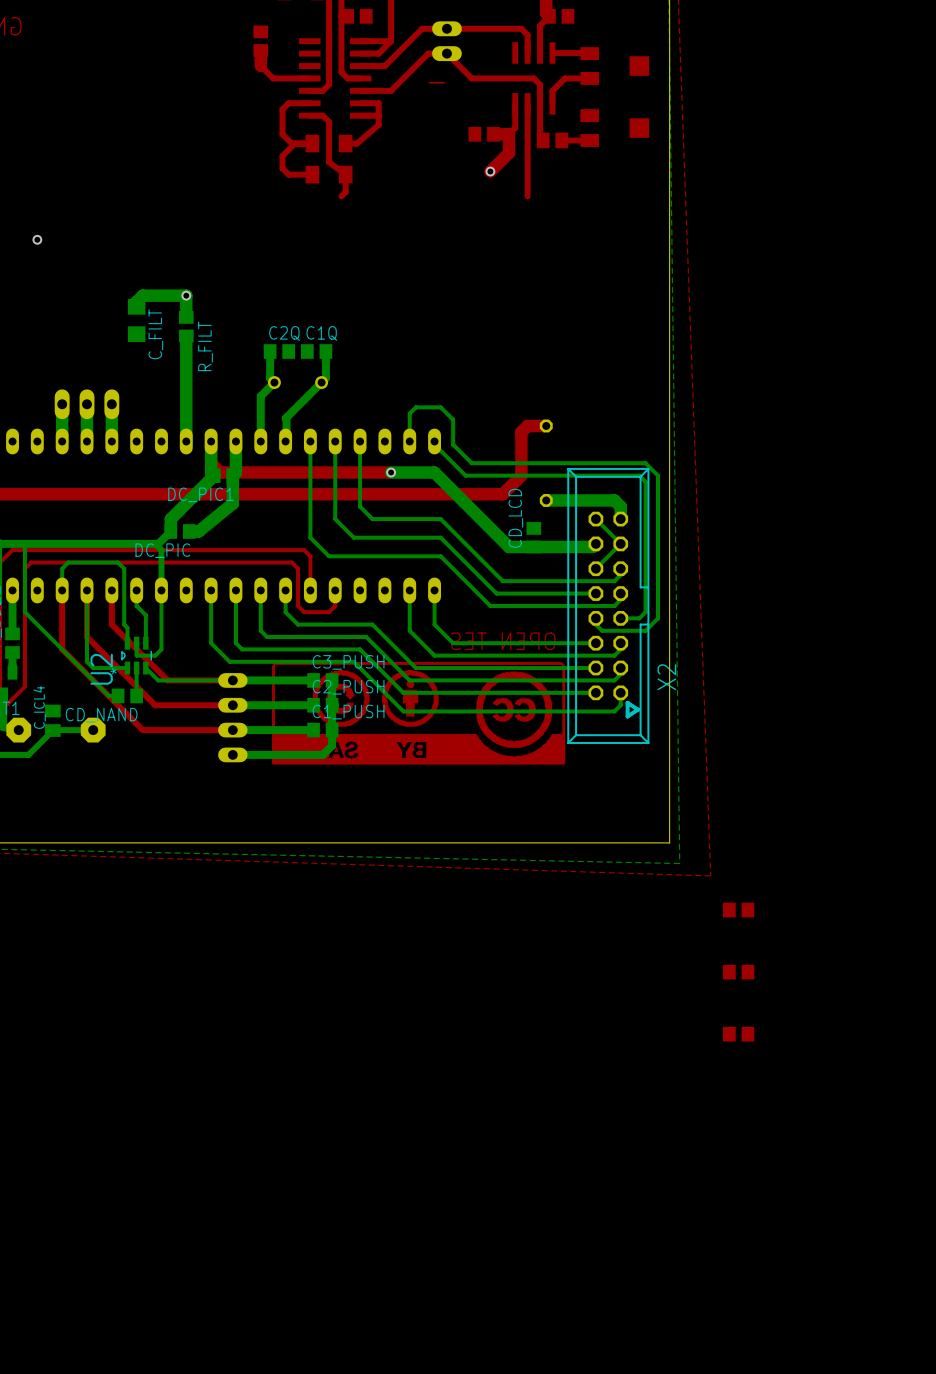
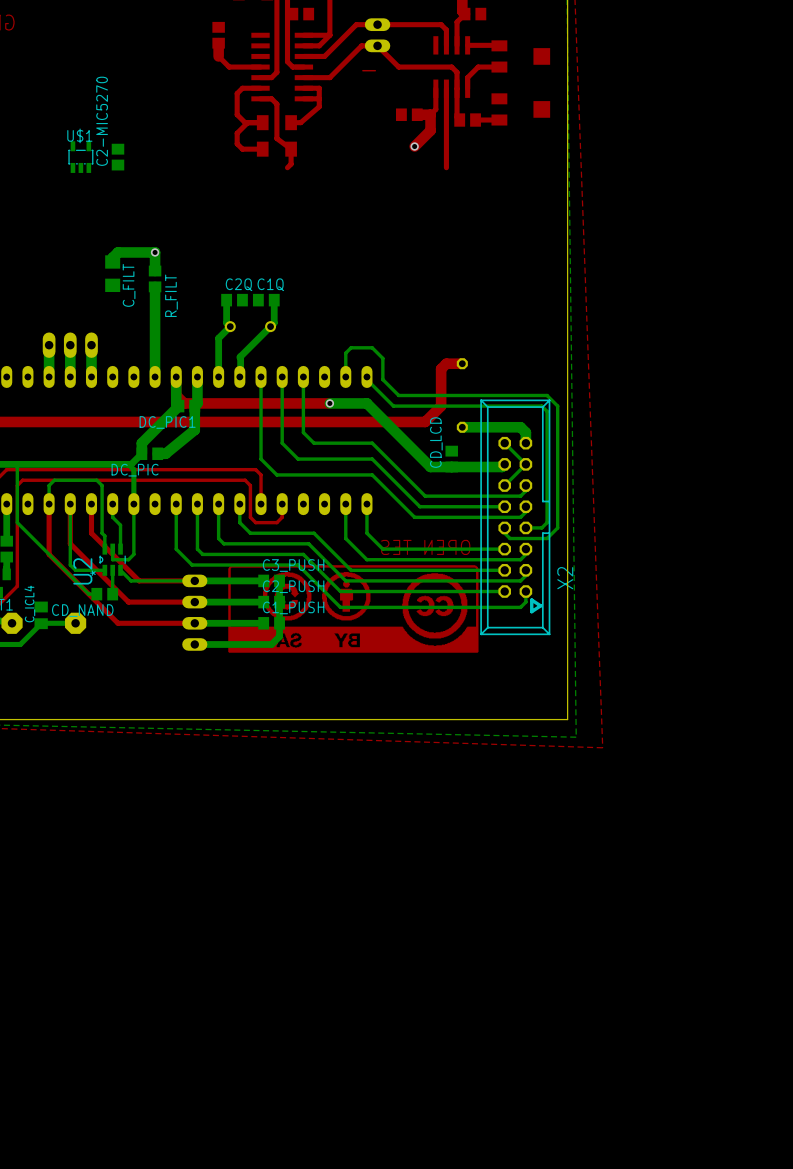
U$1: none -> (80, 157)
C2-MIC5270: none -> (117, 157)
via: (37, 239) -> none
part: (738, 910) -> none
part: (738, 972) -> none
part: (738, 1034) -> none

